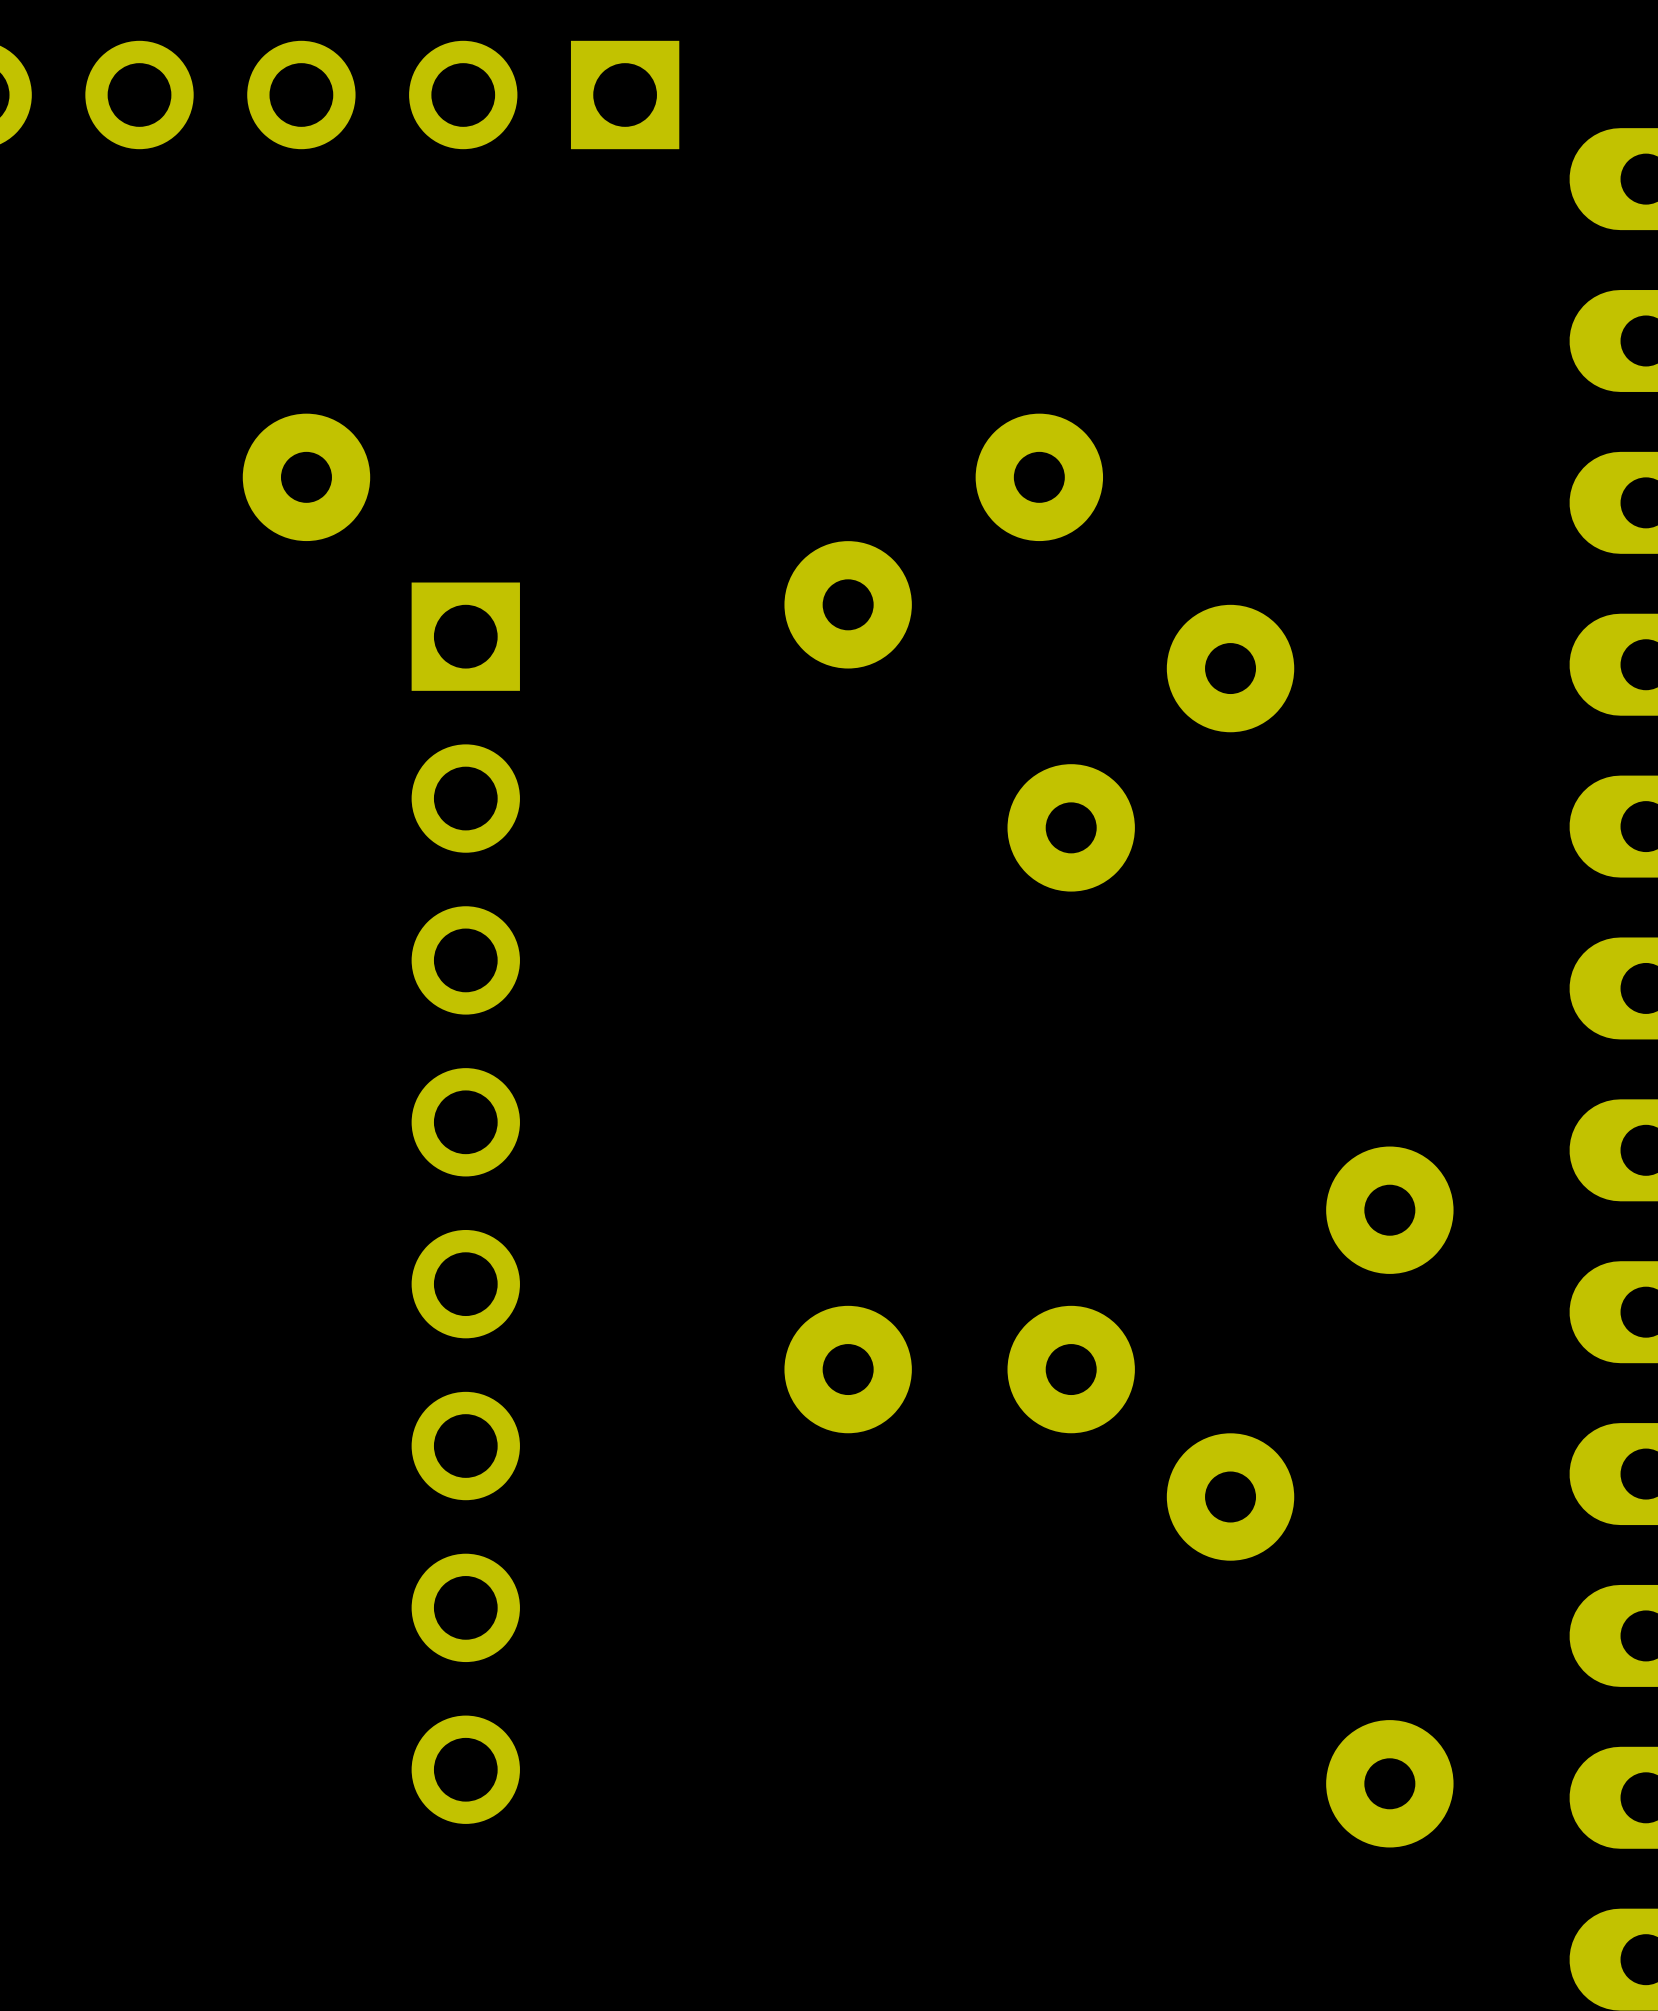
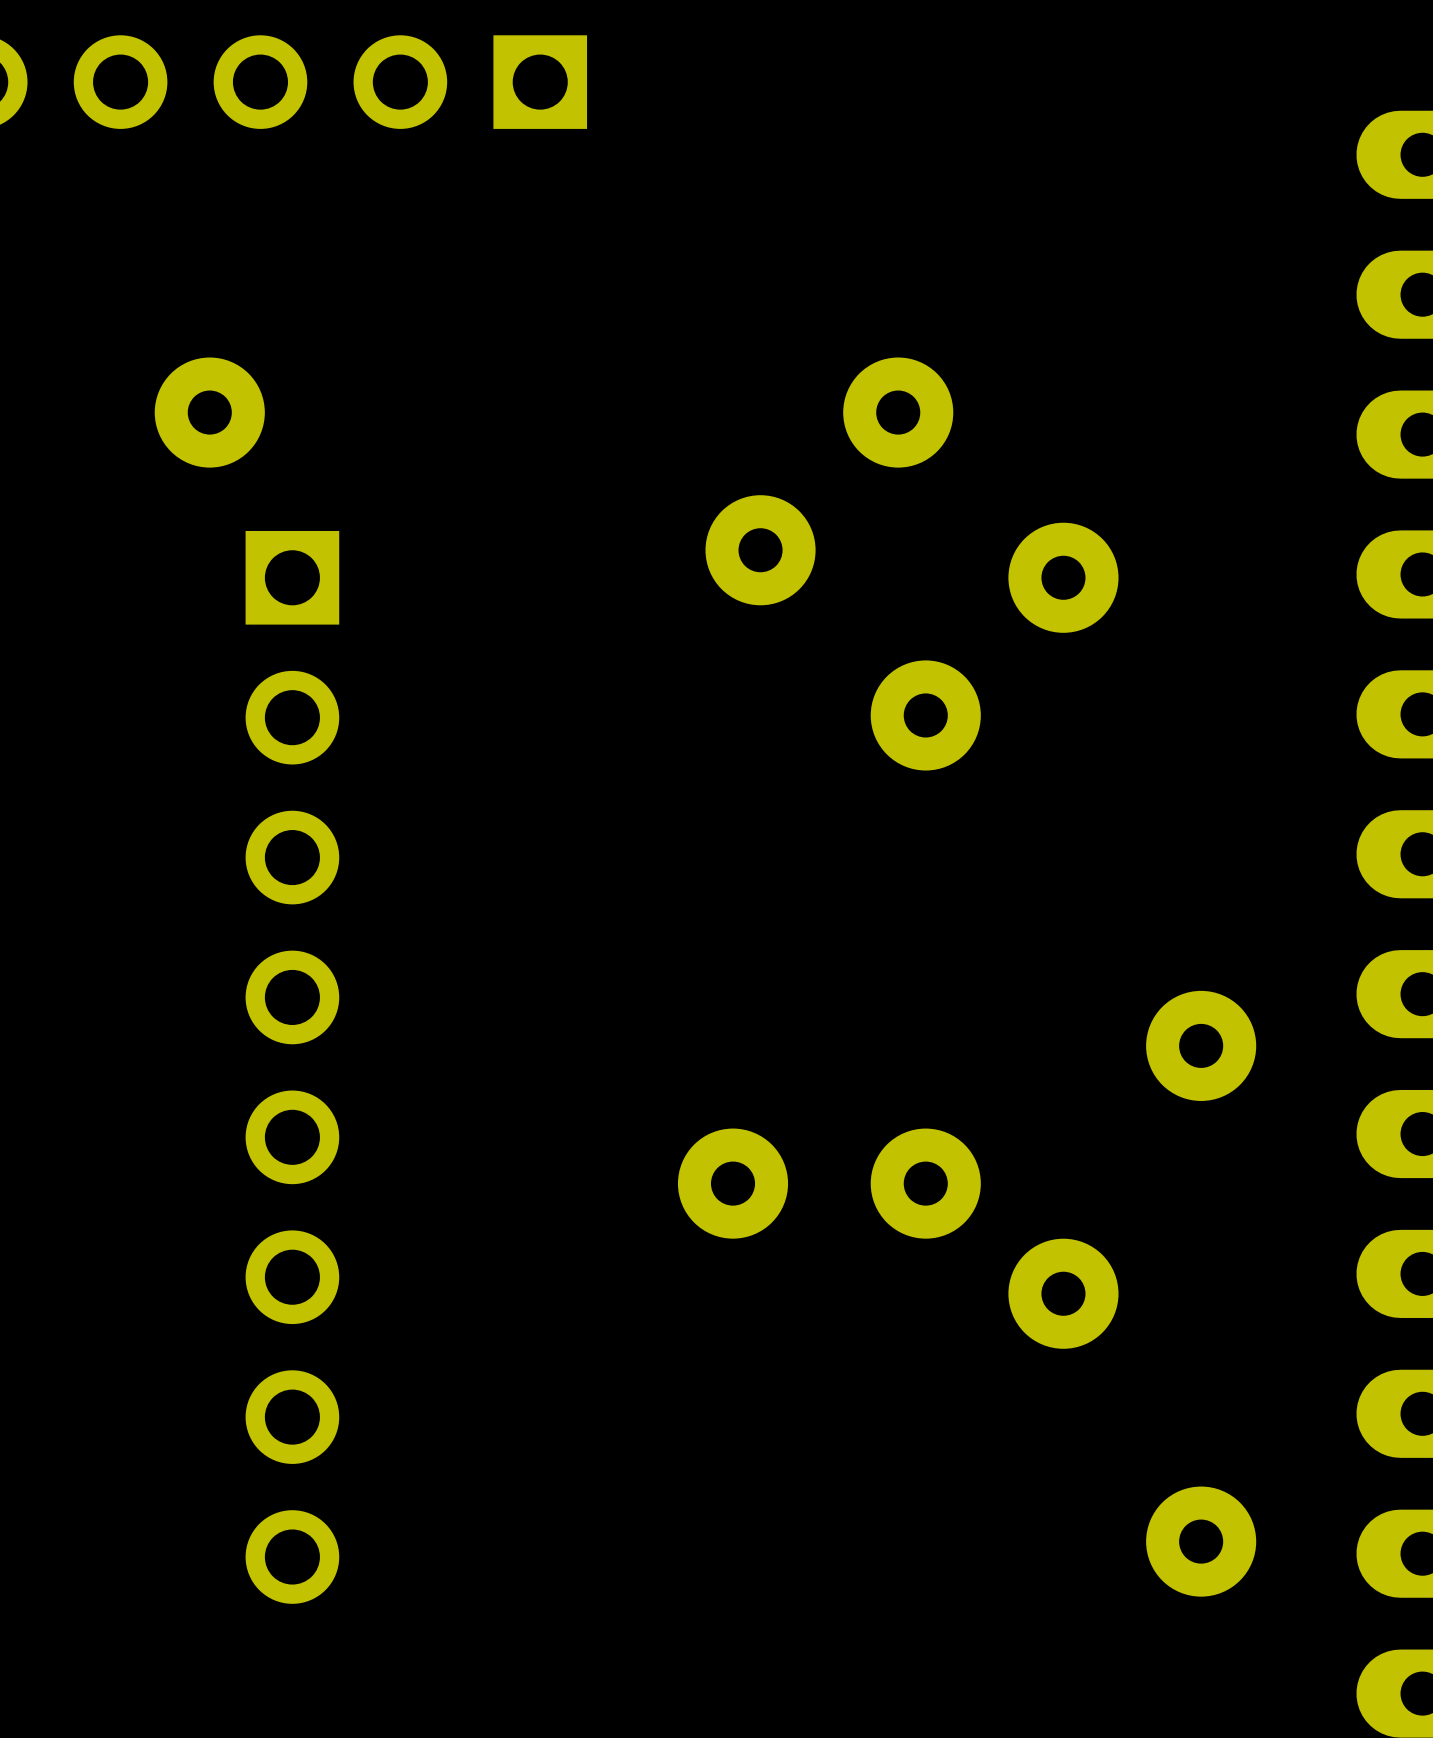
part position: (306, 477) -> (209, 412)
part position: (848, 604) -> (760, 550)
part position: (465, 1203) -> (292, 1067)

